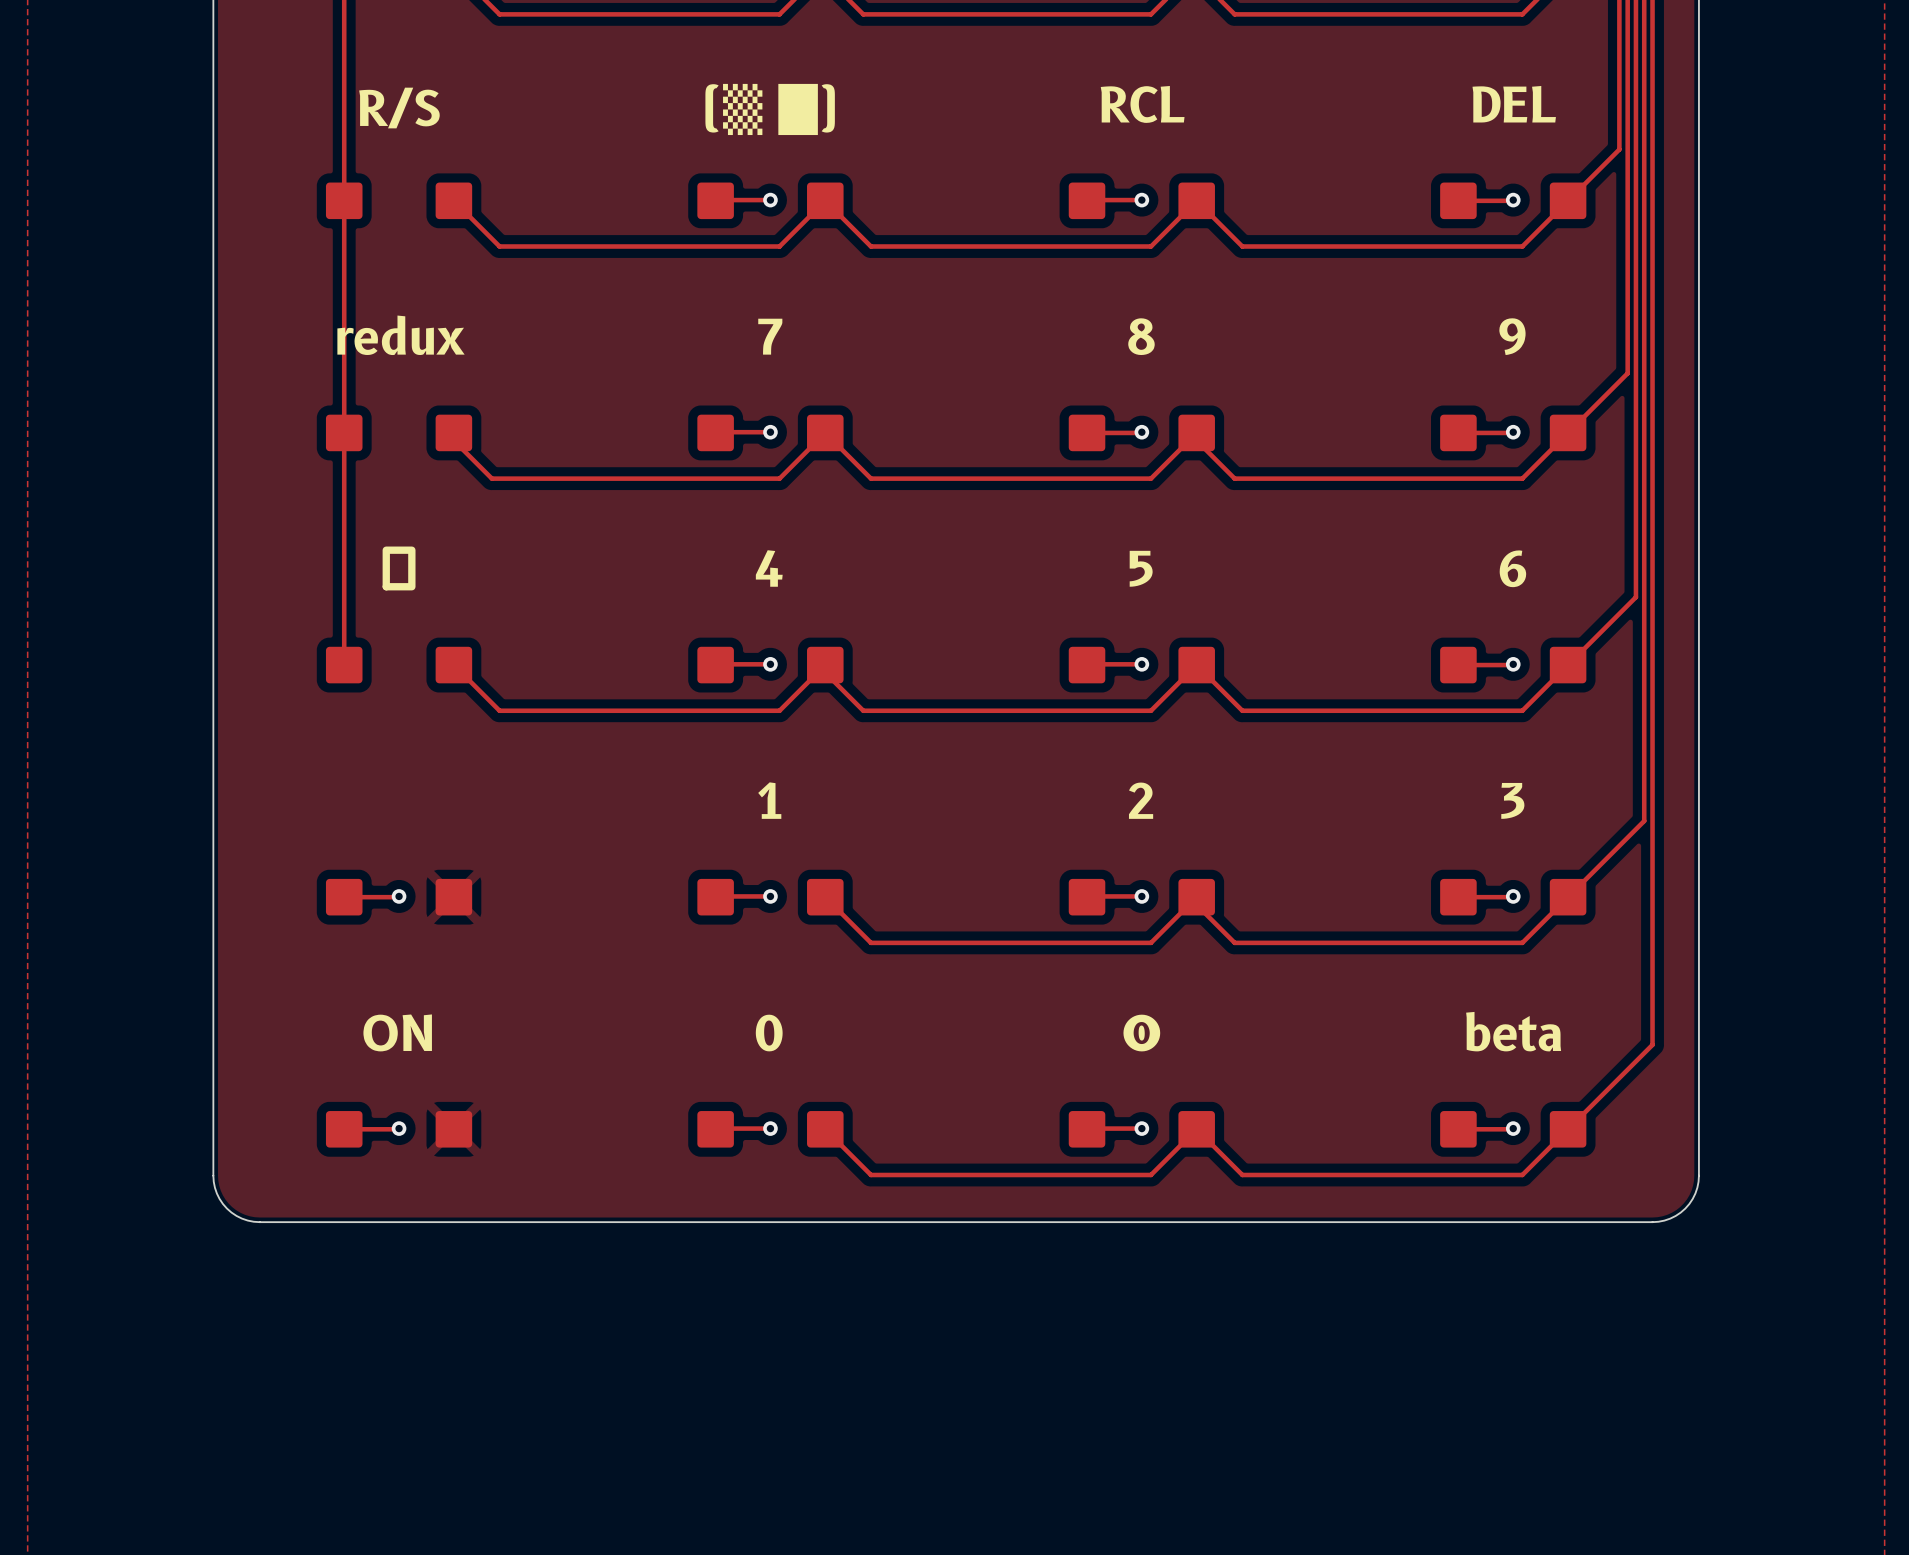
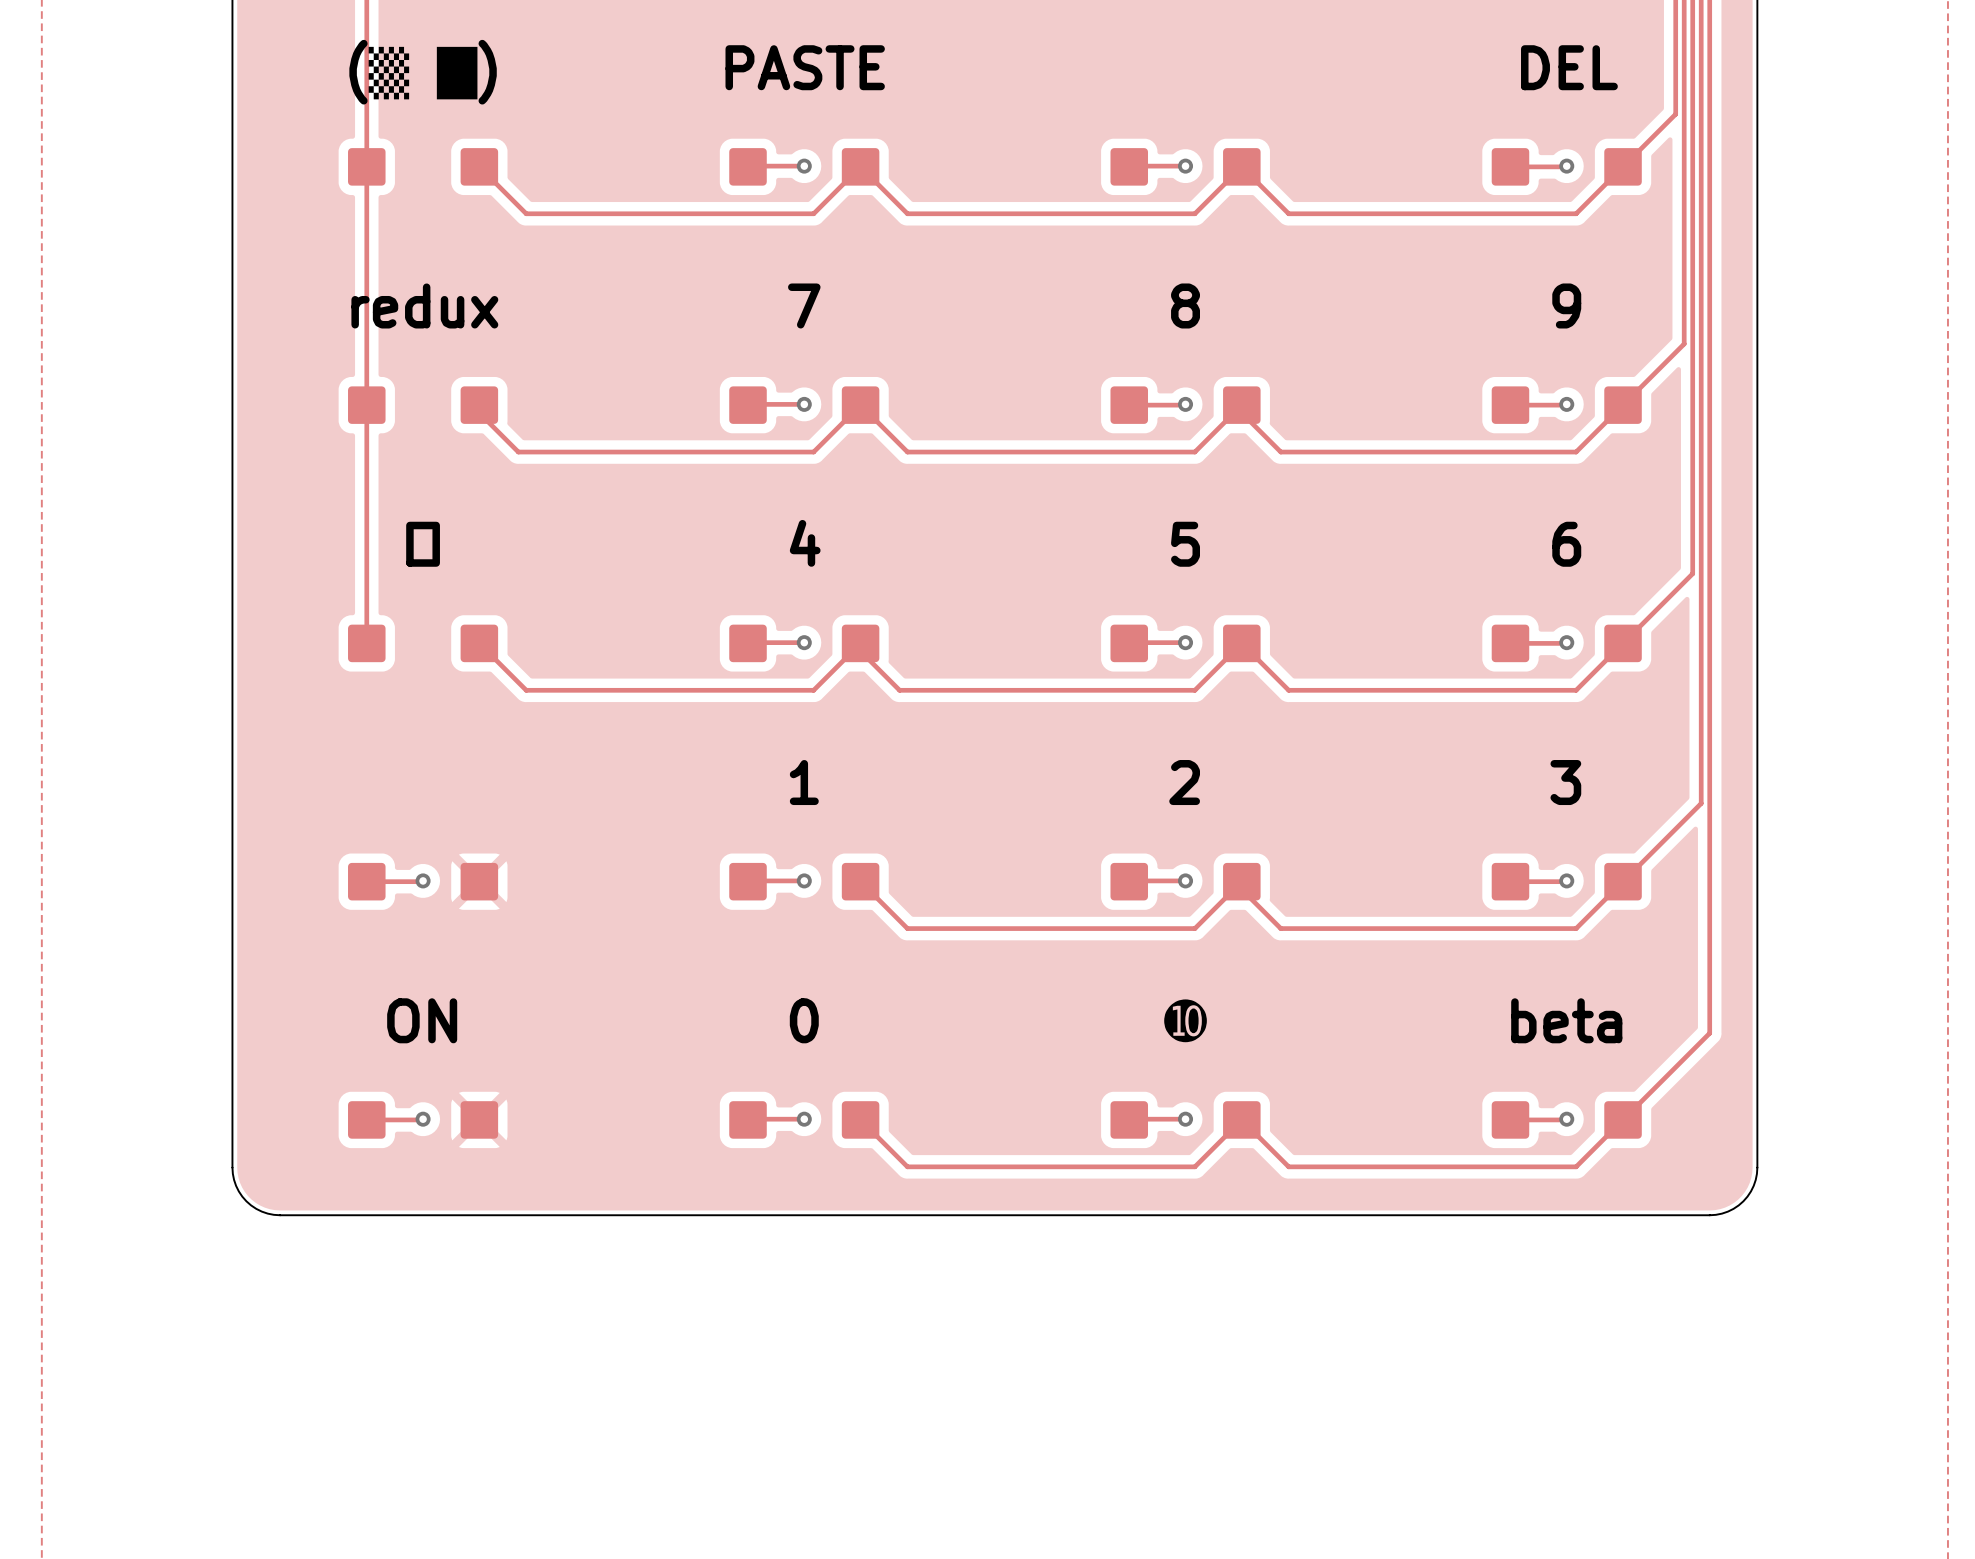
text: RCL (1142, 104) -> none
text: R/S (399, 108) -> (▒ █) (423, 72)
text: (▒ █) (770, 109) -> PASTE (805, 67)

